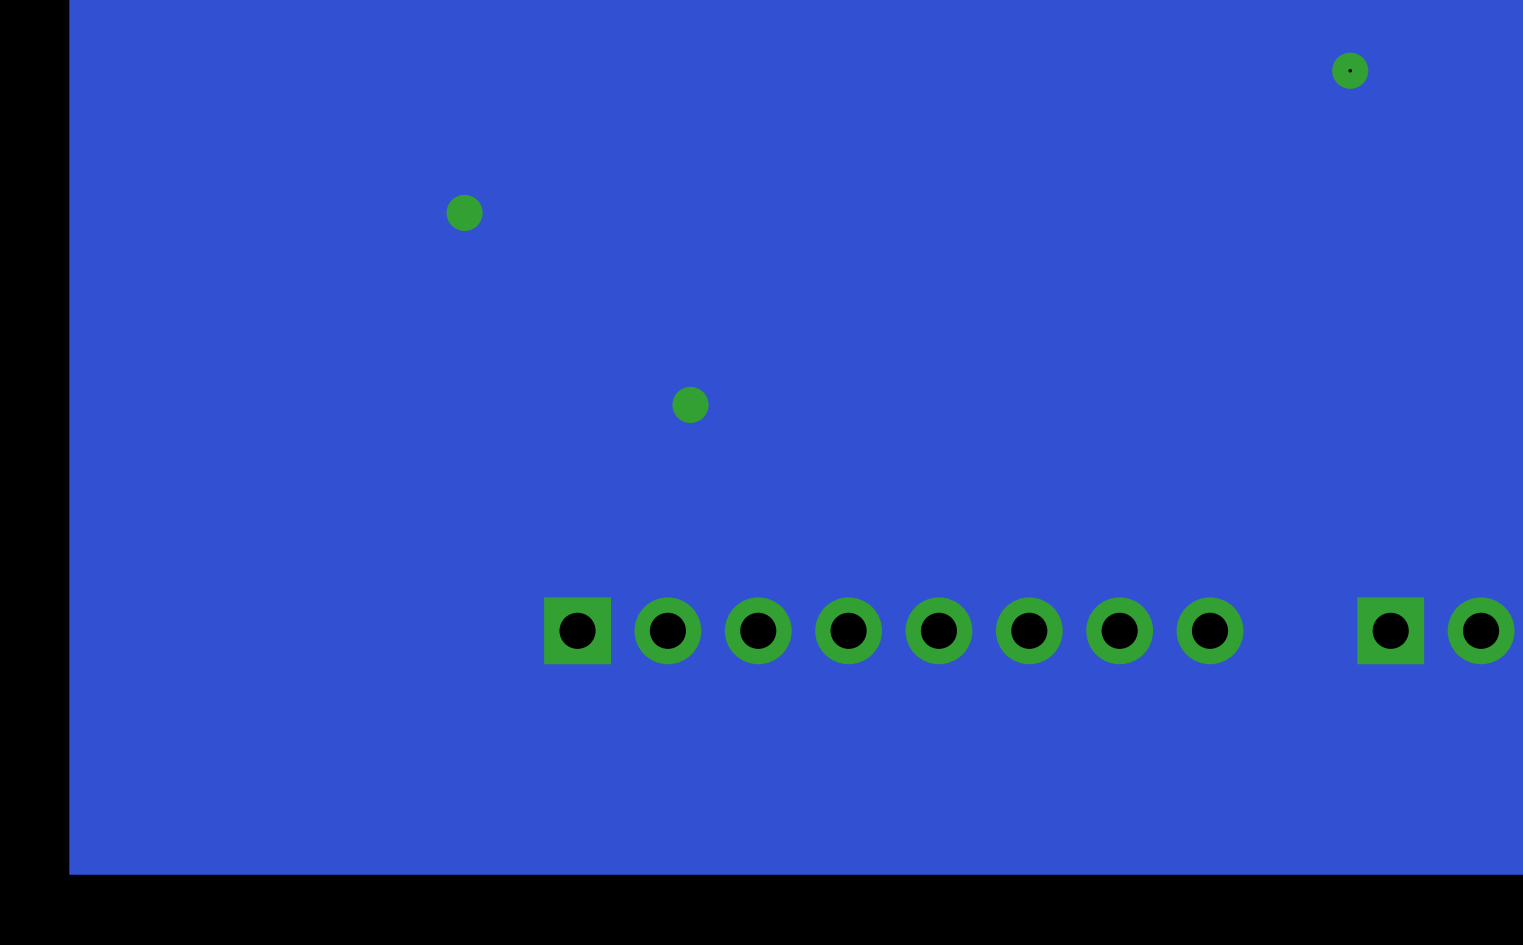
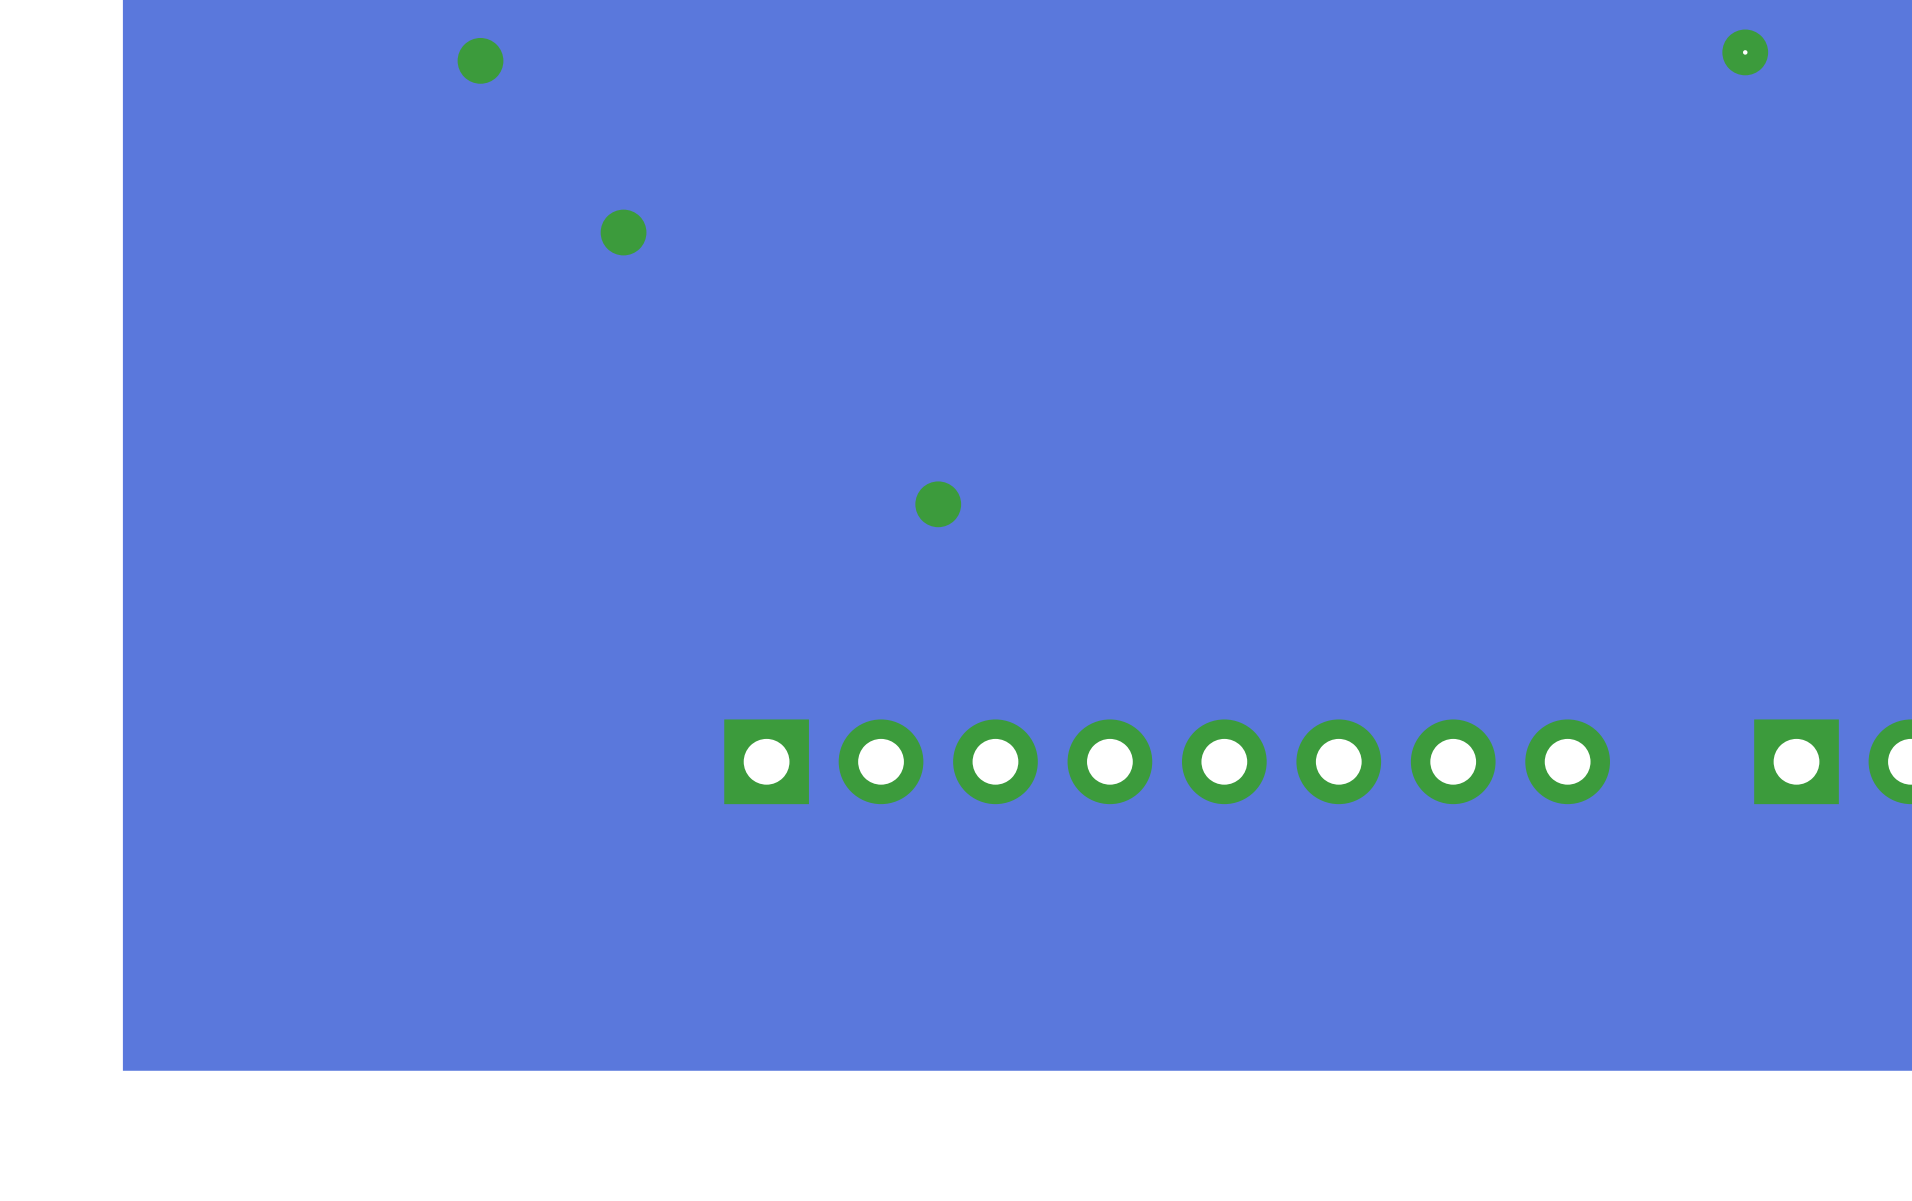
via: none -> (480, 60)
via position: (690, 404) -> (938, 504)

